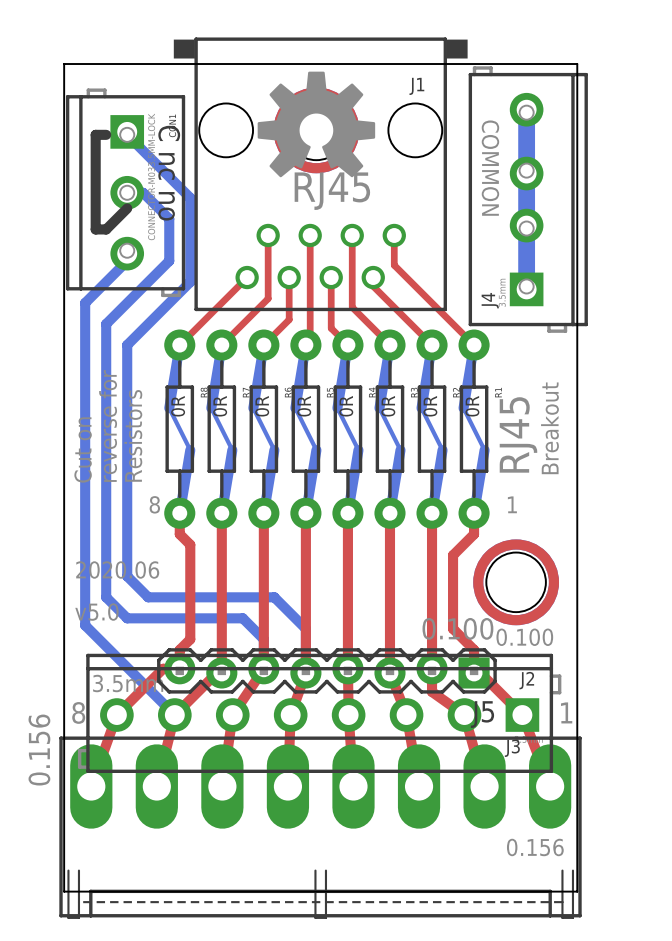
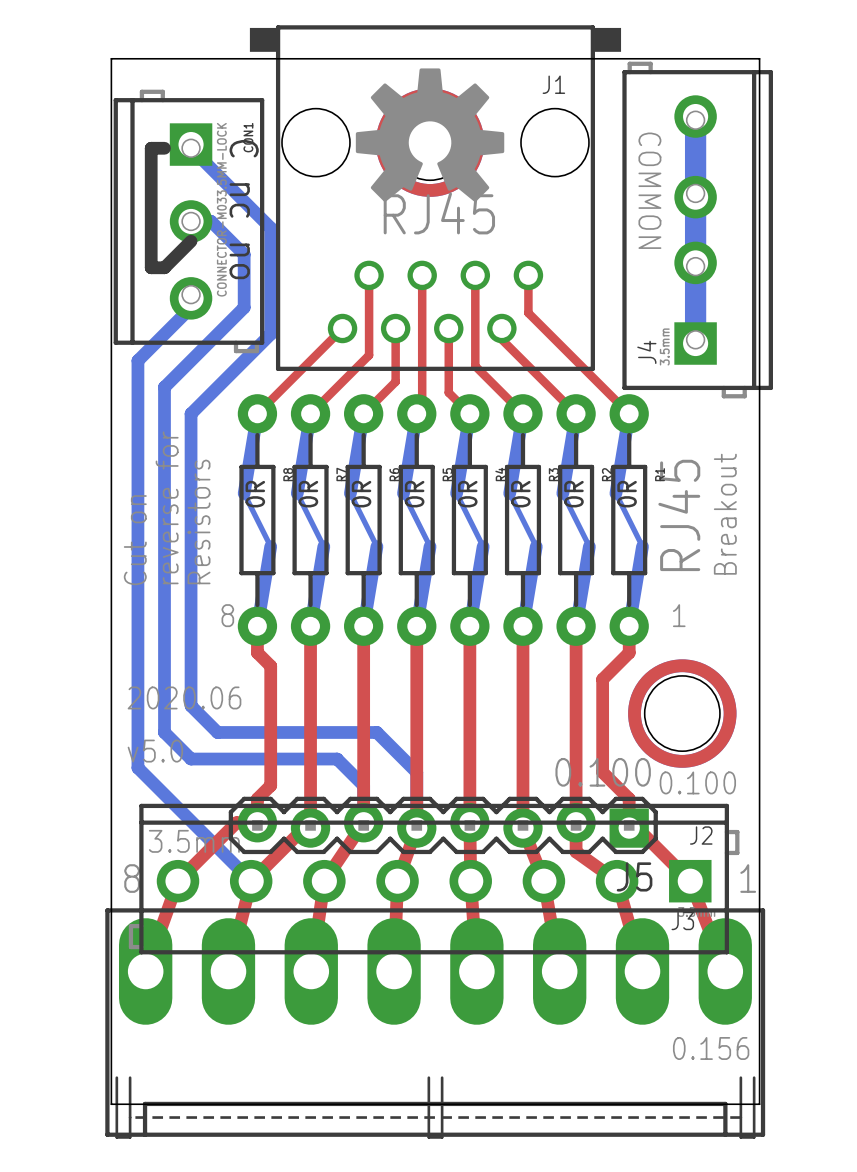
J3 value: 0.156 (39, 750) -> none

